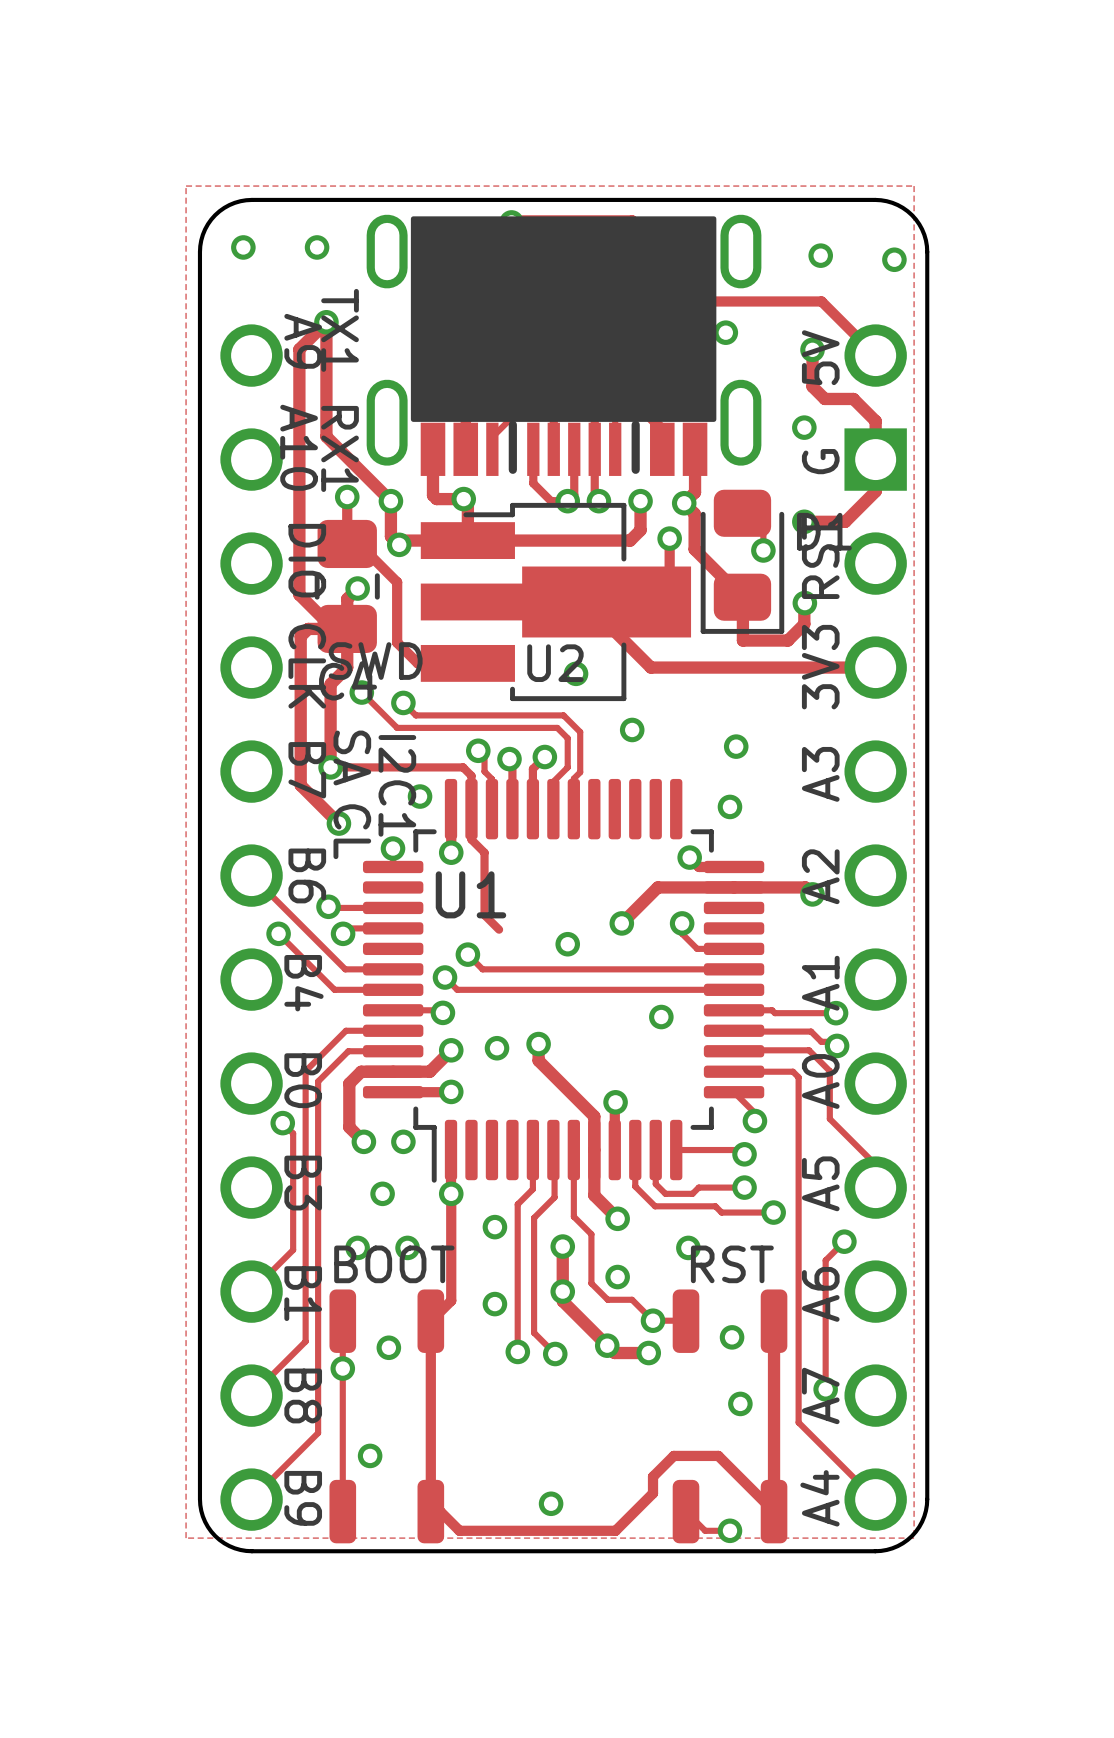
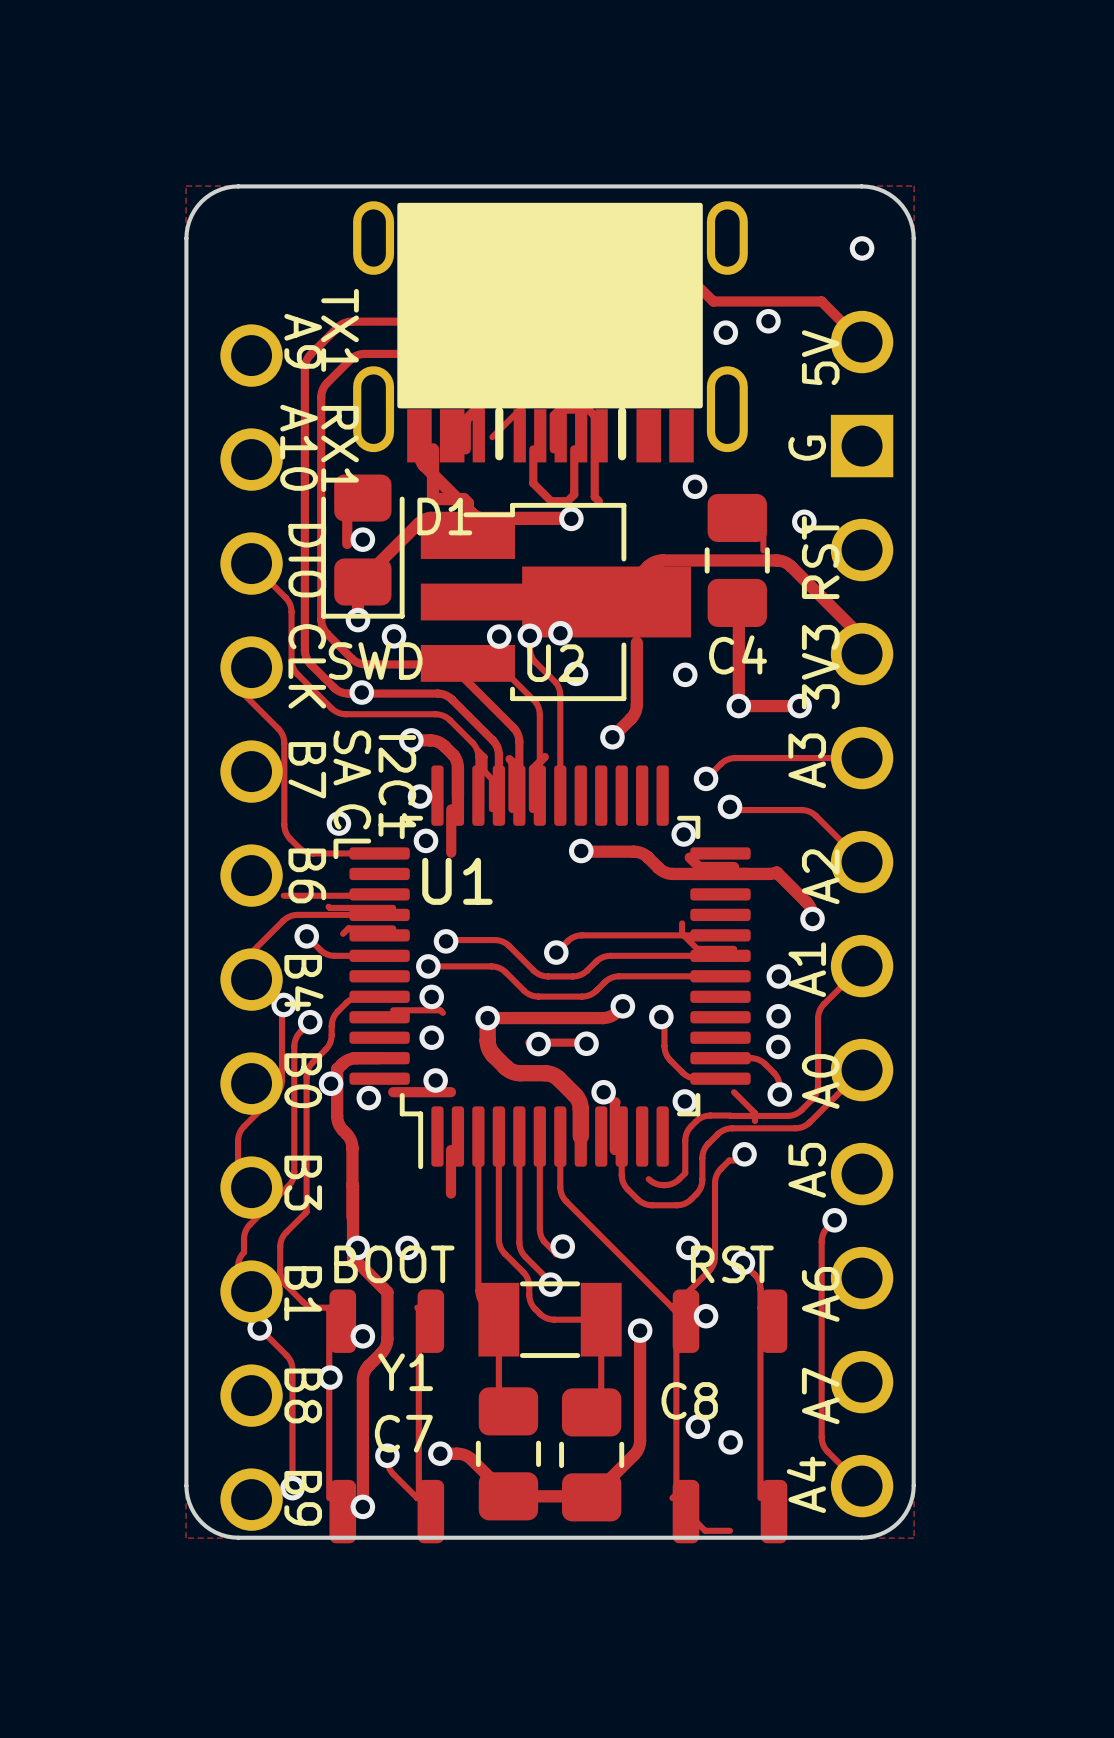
board edge: (251, 199) (875, 199) (892, 202) (902, 207) (912, 215) (922, 229) (927, 251) (927, 1499) (924, 1516) (919, 1526) (912, 1536) (897, 1546) (875, 1551) (251, 1551) (240, 1549) (224, 1543) (215, 1536) (205, 1521) (199, 1499) (199, 251) (205, 229) (215, 215) (229, 205) (251, 199) -> (238, 186) (861, 186) (878, 189) (889, 194) (902, 205) (908, 215) (913, 238) (913, 1485) (912, 1497) (905, 1513) (894, 1526) (884, 1532) (861, 1537) (238, 1537) (226, 1536) (210, 1529) (201, 1522) (191, 1508) (186, 1485) (186, 238) (191, 215) (201, 201) (215, 191) (238, 186)
via: (243, 247) -> none
via: (317, 247) -> none
via: none -> (862, 248)
via: (820, 255) -> none
via: (894, 259) -> none
track: none -> (447, 302) (446, 334) (442, 341) (433, 350) (424, 353) (356, 355) (350, 359) (322, 389) (321, 397) (321, 622) (327, 634) (353, 659) (360, 663) (441, 664) (454, 668) (516, 732) (519, 742) (519, 795)
track: none -> (406, 321) (344, 323) (310, 354) (305, 363) (305, 654) (310, 664) (333, 687) (343, 692) (437, 693) (448, 697) (496, 744) (498, 754) (498, 795)
via: none -> (768, 321)
via: (326, 322) -> none
part position: (564, 345) -> (550, 331)
track: (812, 349) (812, 386) (824, 398) (853, 398) (875, 421) (875, 491) (845, 521) (804, 521) -> none
via: (812, 349) -> none
via: (804, 427) -> none
track: none -> (419, 435) (419, 454) (423, 465) (476, 516) (477, 517) (479, 517) (481, 518) (485, 518) (571, 518) (570, 517) (430, 517) (423, 519) (362, 579) (358, 586) (358, 620)
track: (695, 449) (695, 492) (684, 503) (694, 513) (694, 549) (742, 597) -> none
text position: G (820, 461) -> G (807, 448)
via: (347, 497) -> none
via: (463, 499) -> none
via: (390, 501) -> none
via position: (567, 501) -> (571, 518)
via: (598, 501) -> none
track: (640, 501) (640, 530) (630, 540) (403, 540) (399, 544) (390, 536) (390, 501) (326, 436) (326, 322) (299, 349) (299, 594) (333, 628) -> none
via: (640, 501) -> none
via position: (684, 503) -> (695, 486)
track: (669, 538) (669, 571) -> none
via: (669, 538) -> none
via: none -> (362, 539)
track: (358, 543) (397, 582) (397, 642) (417, 663) (467, 663) -> none
via: (399, 544) -> none
track: none -> (238, 550) (289, 602) (291, 612) (291, 662) (297, 674) (331, 708) (340, 713) (435, 714) (447, 718) (476, 749) (478, 795)
via: (763, 550) -> none
D1 position: (742, 561) -> (362, 546)
track: none -> (591, 581) (633, 581) (649, 565) (660, 560) (781, 561) (791, 566) (857, 632) (861, 641) (862, 654)
C4 position: (347, 586) -> (737, 560)
track: (357, 588) (347, 598) (347, 667) (330, 684) (330, 767) (463, 767) (471, 775) (471, 839) (484, 852) (484, 915) (499, 929) -> none
via: (357, 588) -> none
track: (742, 597) (742, 640) (787, 640) (804, 624) (804, 603) -> none
track: (585, 601) (650, 667) (875, 667) -> none
track: none -> (737, 602) (738, 604) (738, 706) (799, 706)
via: (804, 603) -> none
via: none -> (358, 620)
track: (347, 628) (308, 628) (300, 636) (300, 785) (338, 823) -> none
via: none -> (560, 633)
track: none -> (529, 635) (532, 657) (556, 682) (559, 691) (560, 795)
via: none -> (529, 635)
via: none -> (394, 636)
track: none -> (499, 636) (499, 659) (501, 666) (535, 702) (539, 710) (539, 795)
via: none -> (499, 636)
track: none -> (636, 642) (635, 710) (632, 717) (612, 737)
track: none -> (238, 654) (238, 681) (240, 689) (278, 728) (283, 737) (284, 824) (287, 835) (300, 849) (310, 853) (379, 853)
via: none -> (685, 674)
track: (361, 692) (397, 727) (557, 727) (567, 738) (567, 767) (553, 781) (553, 809) -> none
track: (403, 702) (415, 715) (563, 715) (580, 732) (580, 772) (573, 778) (573, 809) -> none
via: (403, 702) -> none
via: none -> (738, 706)
via: none -> (799, 706)
via position: (632, 729) -> (612, 737)
track: none -> (411, 740) (436, 741) (453, 755) (457, 765) (457, 795)
via: none -> (411, 740)
via: (736, 746) -> none
via: (478, 750) -> none
via: (544, 757) -> none
track: none -> (862, 758) (733, 758) (722, 762) (706, 778)
via: (509, 759) -> none
via: (330, 767) -> none
text position: A3 (820, 774) -> A3 (807, 760)
via: none -> (706, 778)
track: none -> (727, 810) (809, 811) (862, 862)
via: none -> (426, 840)
via: (393, 848) -> none
via: none -> (581, 850)
track: none -> (581, 851) (639, 852) (646, 855) (661, 870) (671, 873) (776, 872) (807, 903) (811, 910) (812, 918)
via: (451, 852) -> none
via position: (689, 857) -> (683, 834)
track: (251, 875) (345, 969) (393, 969) -> none
track: none -> (379, 894) (353, 892) (350, 895) (283, 895)
track: (812, 894) (805, 887) (657, 887) (621, 923) -> none
via position: (812, 894) -> (812, 918)
via: (328, 906) -> none
track: none -> (379, 914) (289, 916) (238, 966)
via: (621, 923) -> none
via: (682, 923) -> none
part position: (875, 927) -> (862, 914)
track: (278, 933) (334, 989) (393, 989) -> none
via: (278, 933) -> none
via: (343, 933) -> none
track: none -> (720, 935) (579, 935) (570, 938) (556, 952)
track: none -> (306, 936) (321, 951) (328, 954) (379, 955)
via: none -> (306, 936)
track: none -> (446, 941) (500, 940) (507, 944) (535, 972) (548, 976) (578, 975) (585, 971) (597, 960) (607, 956) (720, 955)
via position: (567, 944) -> (556, 952)
track: (467, 954) (482, 969) (734, 969) -> none
via position: (467, 954) -> (446, 941)
track: none -> (428, 966) (497, 967) (504, 971) (526, 992) (538, 996) (587, 995) (606, 980) (616, 976) (720, 976)
via: none -> (428, 966)
track: none -> (862, 966) (819, 1010) (817, 1087) (812, 1099) (800, 1111) (791, 1115) (730, 1115)
via: none -> (778, 976)
track: (445, 977) (457, 989) (734, 989) -> none
via: (445, 977) -> none
U1 position: (563, 980) -> (550, 967)
text position: A1 (820, 983) -> A1 (807, 969)
track: none -> (379, 996) (355, 997) (337, 1011) (332, 1020) (328, 1045) (308, 1069) (306, 1212) (284, 1234) (280, 1244) (280, 1272) (284, 1283) (306, 1304) (314, 1307) (329, 1307) (329, 1498)
via: none -> (431, 996)
track: none -> (283, 1004) (282, 1006) (281, 1085) (276, 1094) (240, 1131) (238, 1138) (238, 1174)
via: none -> (283, 1004)
track: none -> (622, 1006) (613, 1014) (604, 1018) (487, 1018) (489, 1048) (507, 1068) (518, 1073) (552, 1074) (576, 1096) (580, 1107) (580, 1136)
via: none -> (622, 1006)
track: (734, 1010) (772, 1010) (774, 1013) (836, 1013) -> none
via: (442, 1012) -> none
via: (836, 1013) -> none
via: none -> (778, 1016)
via: none -> (487, 1018)
track: none -> (664, 1018) (664, 1048) (670, 1060) (689, 1077) (720, 1078)
track: none -> (310, 1022) (297, 1035) (294, 1044) (293, 1177) (288, 1186) (246, 1229) (244, 1236) (244, 1252) (238, 1262) (238, 1278)
via: none -> (310, 1022)
track: (393, 1030) (345, 1030) (305, 1071) (305, 1341) (251, 1395) -> none
track: (734, 1031) (811, 1031) (821, 1041) (833, 1041) (837, 1045) -> none
track: none -> (529, 1042) (586, 1043)
via: none -> (586, 1043)
track: (538, 1044) (538, 1060) (594, 1116) (594, 1195) (617, 1218) -> none
via: (837, 1045) -> none
via: none -> (778, 1046)
via: (497, 1048) -> none
track: (451, 1050) (429, 1071) (361, 1071) (349, 1083) (349, 1127) (363, 1141) -> none
via position: (451, 1050) -> (431, 1037)
track: (734, 1050) (809, 1050) (829, 1071) (829, 1118) (875, 1164) -> none
track: (393, 1051) (348, 1051) (318, 1081) (318, 1433) (251, 1499) -> none
track: none -> (379, 1058) (350, 1059) (337, 1069) (337, 1119) (340, 1127) (349, 1138) (352, 1145) (352, 1217)
track: none -> (720, 1058) (752, 1058) (762, 1061) (777, 1076) (779, 1094)
track: none -> (862, 1070) (803, 1126) (729, 1128) (719, 1132) (707, 1145) (703, 1152) (702, 1182) (699, 1189) (689, 1200) (682, 1204) (646, 1204) (639, 1201) (626, 1187) (621, 1176) (621, 1136)
track: (734, 1071) (792, 1071) (798, 1077) (798, 1422) (875, 1499) -> none
via: none -> (331, 1083)
via position: (451, 1091) -> (435, 1080)
via: none -> (779, 1094)
via: none -> (368, 1098)
via: none -> (684, 1101)
via position: (615, 1102) -> (603, 1092)
track: none -> (730, 1115) (705, 1116) (689, 1127) (685, 1138) (685, 1173) (677, 1180) (663, 1185) (655, 1183) (648, 1179)
via: (754, 1121) -> none
track: (282, 1123) (293, 1133) (293, 1249) (251, 1291) -> none
via: (282, 1123) -> none
track: none -> (478, 1136) (478, 1292) (483, 1303) (498, 1319) (499, 1395) (501, 1403) (508, 1411)
track: none -> (498, 1136) (499, 1243) (503, 1252) (526, 1276) (532, 1304) (541, 1315) (550, 1319) (601, 1319) (601, 1397) (598, 1404) (591, 1412)
track: none -> (519, 1136) (520, 1247) (523, 1254) (550, 1282) (550, 1284)
track: none -> (539, 1136) (539, 1231) (543, 1241) (556, 1254)
track: none -> (560, 1136) (560, 1189) (563, 1198) (676, 1311) (676, 1494) (672, 1498)
via: (363, 1141) -> none
via: (403, 1141) -> none
track: (532, 1150) (532, 1189) (517, 1204) (517, 1351) -> none
track: (573, 1150) (573, 1216) (591, 1234) (591, 1283) (607, 1299) (632, 1299) (653, 1320) (685, 1320) -> none
track: (635, 1150) (635, 1186) (655, 1206) (715, 1206) (721, 1212) (773, 1212) -> none
track: (655, 1150) (655, 1184) (665, 1193) (692, 1193) (698, 1187) (744, 1187) -> none
track: (676, 1150) (740, 1150) (744, 1154) -> none
track: (554, 1151) (554, 1197) (534, 1217) (534, 1332) (555, 1354) -> none
track: none -> (734, 1160) (729, 1160) (719, 1170) (715, 1178) (713, 1264) (672, 1307)
text position: A5 (820, 1183) -> A5 (807, 1170)
track: none -> (352, 1185) (353, 1259) (387, 1292) (386, 1344) (382, 1351) (367, 1367) (363, 1377) (362, 1506)
via: (744, 1187) -> none
via: (382, 1193) -> none
track: (451, 1193) (451, 1300) (430, 1321) (430, 1511) (440, 1511) (459, 1530) (615, 1530) (653, 1493) (653, 1476) (673, 1455) (718, 1455) (774, 1511) (774, 1321) -> none
via: (451, 1193) -> none
via: (773, 1212) -> none
via: (617, 1218) -> none
track: none -> (834, 1220) (824, 1231) (821, 1241) (821, 1439) (825, 1449) (862, 1486)
via: (494, 1227) -> none
track: (844, 1241) (825, 1260) (825, 1389) -> none
via position: (844, 1241) -> (834, 1220)
track: (562, 1246) (562, 1301) (614, 1353) (648, 1353) -> none
track: none -> (742, 1262) (757, 1277) (760, 1286) (760, 1498)
via: none -> (742, 1262)
via: (617, 1277) -> none
via position: (562, 1291) -> (550, 1284)
via: (494, 1304) -> none
track: none -> (417, 1307) (418, 1309) (418, 1496) (417, 1498) (390, 1471) (387, 1455)
via: none -> (706, 1316)
Y1: none -> (550, 1319)
via: (653, 1320) -> none
track: (342, 1321) (342, 1511) -> none
track: none -> (259, 1328) (286, 1355) (291, 1364) (292, 1488)
via: none -> (259, 1328)
track: none -> (640, 1330) (639, 1446) (634, 1454) (591, 1497) (508, 1496) (467, 1456) (460, 1453) (440, 1453)
via: none -> (640, 1330)
via: none -> (362, 1336)
via: (732, 1337) -> none
via: (607, 1345) -> none
via: (388, 1347) -> none
via: (517, 1351) -> none
via: (648, 1353) -> none
via: (555, 1354) -> none
via position: (342, 1368) -> (330, 1377)
via: (825, 1389) -> none
via: (740, 1403) -> none
via: none -> (697, 1426)
via: none -> (730, 1442)
via: none -> (440, 1453)
C7: none -> (508, 1453)
C8: none -> (591, 1454)
via position: (370, 1455) -> (387, 1455)
via: none -> (292, 1488)
text position: A4 (819, 1498) -> A4 (806, 1484)
via: (551, 1503) -> none
via: none -> (362, 1506)
via: (729, 1530) -> none

